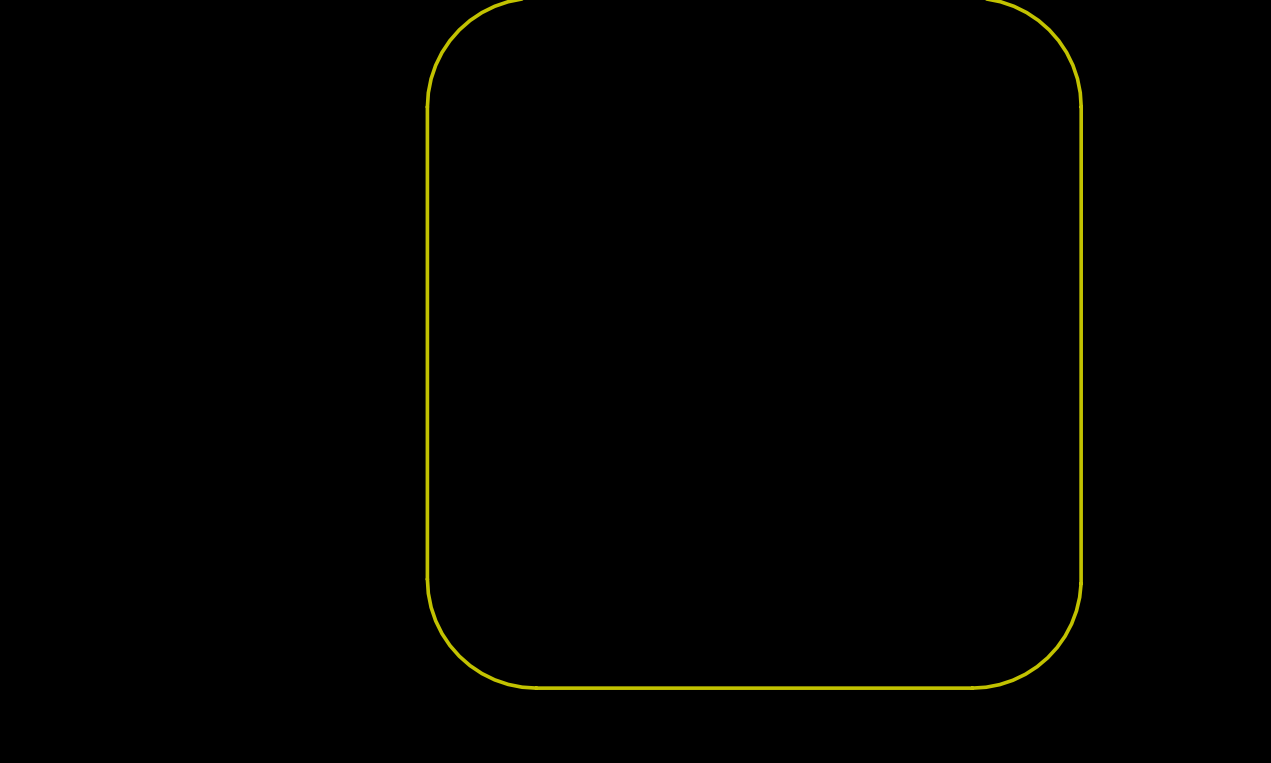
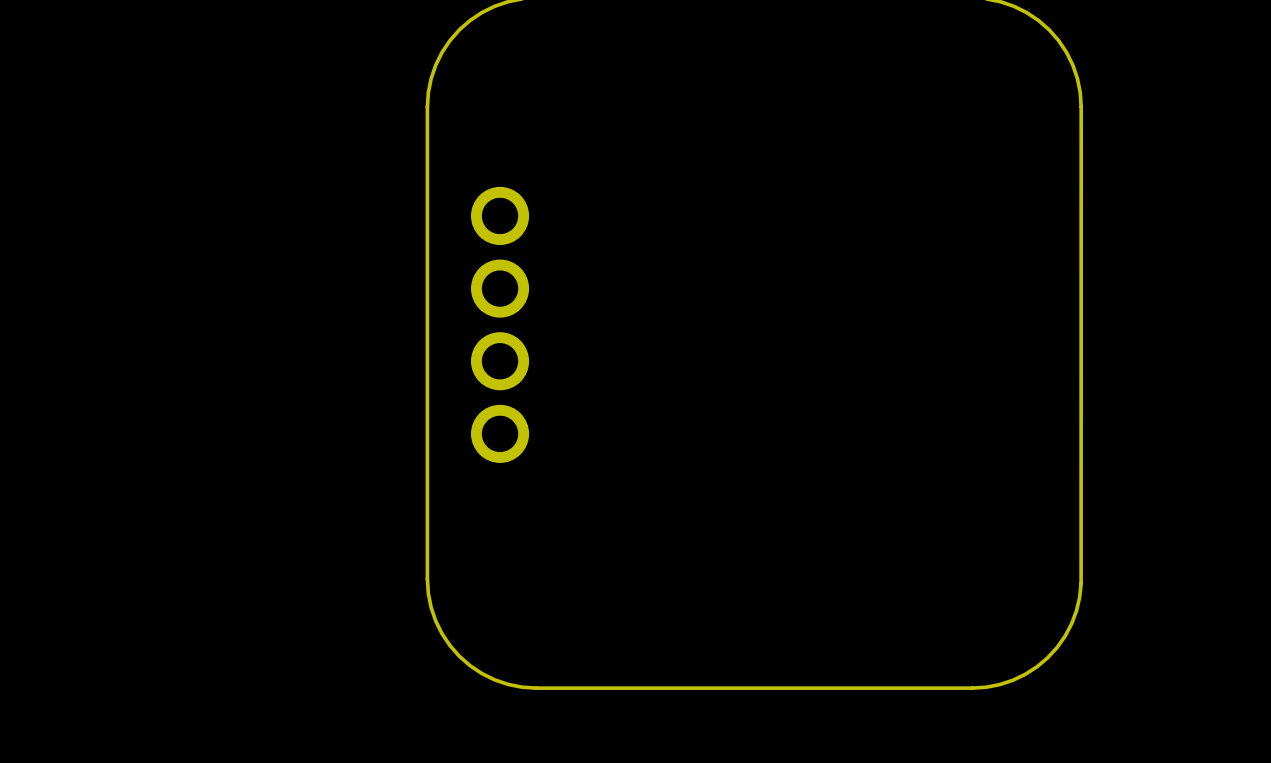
part: none -> (500, 324)

